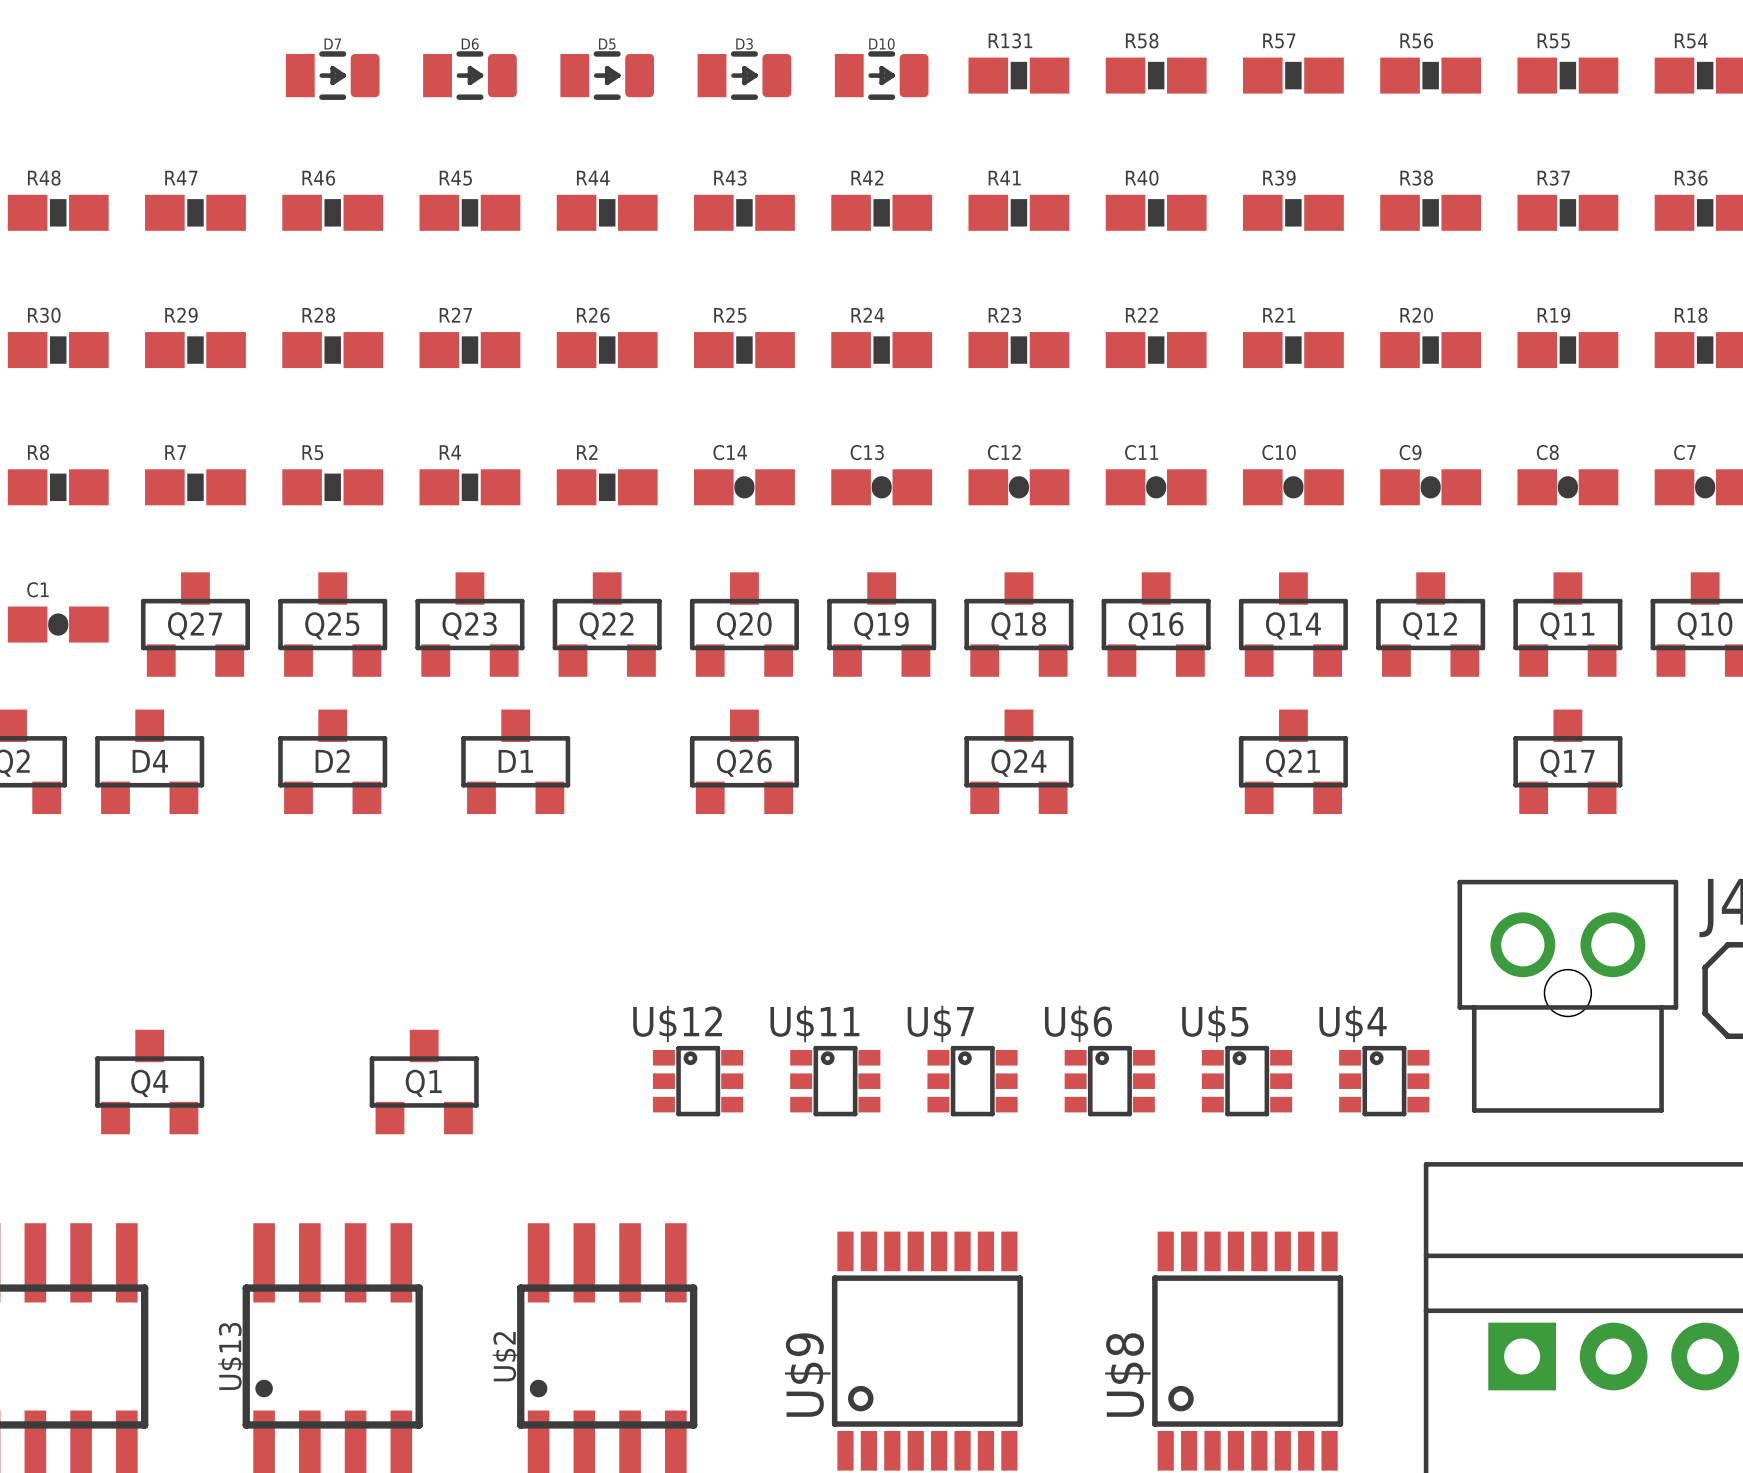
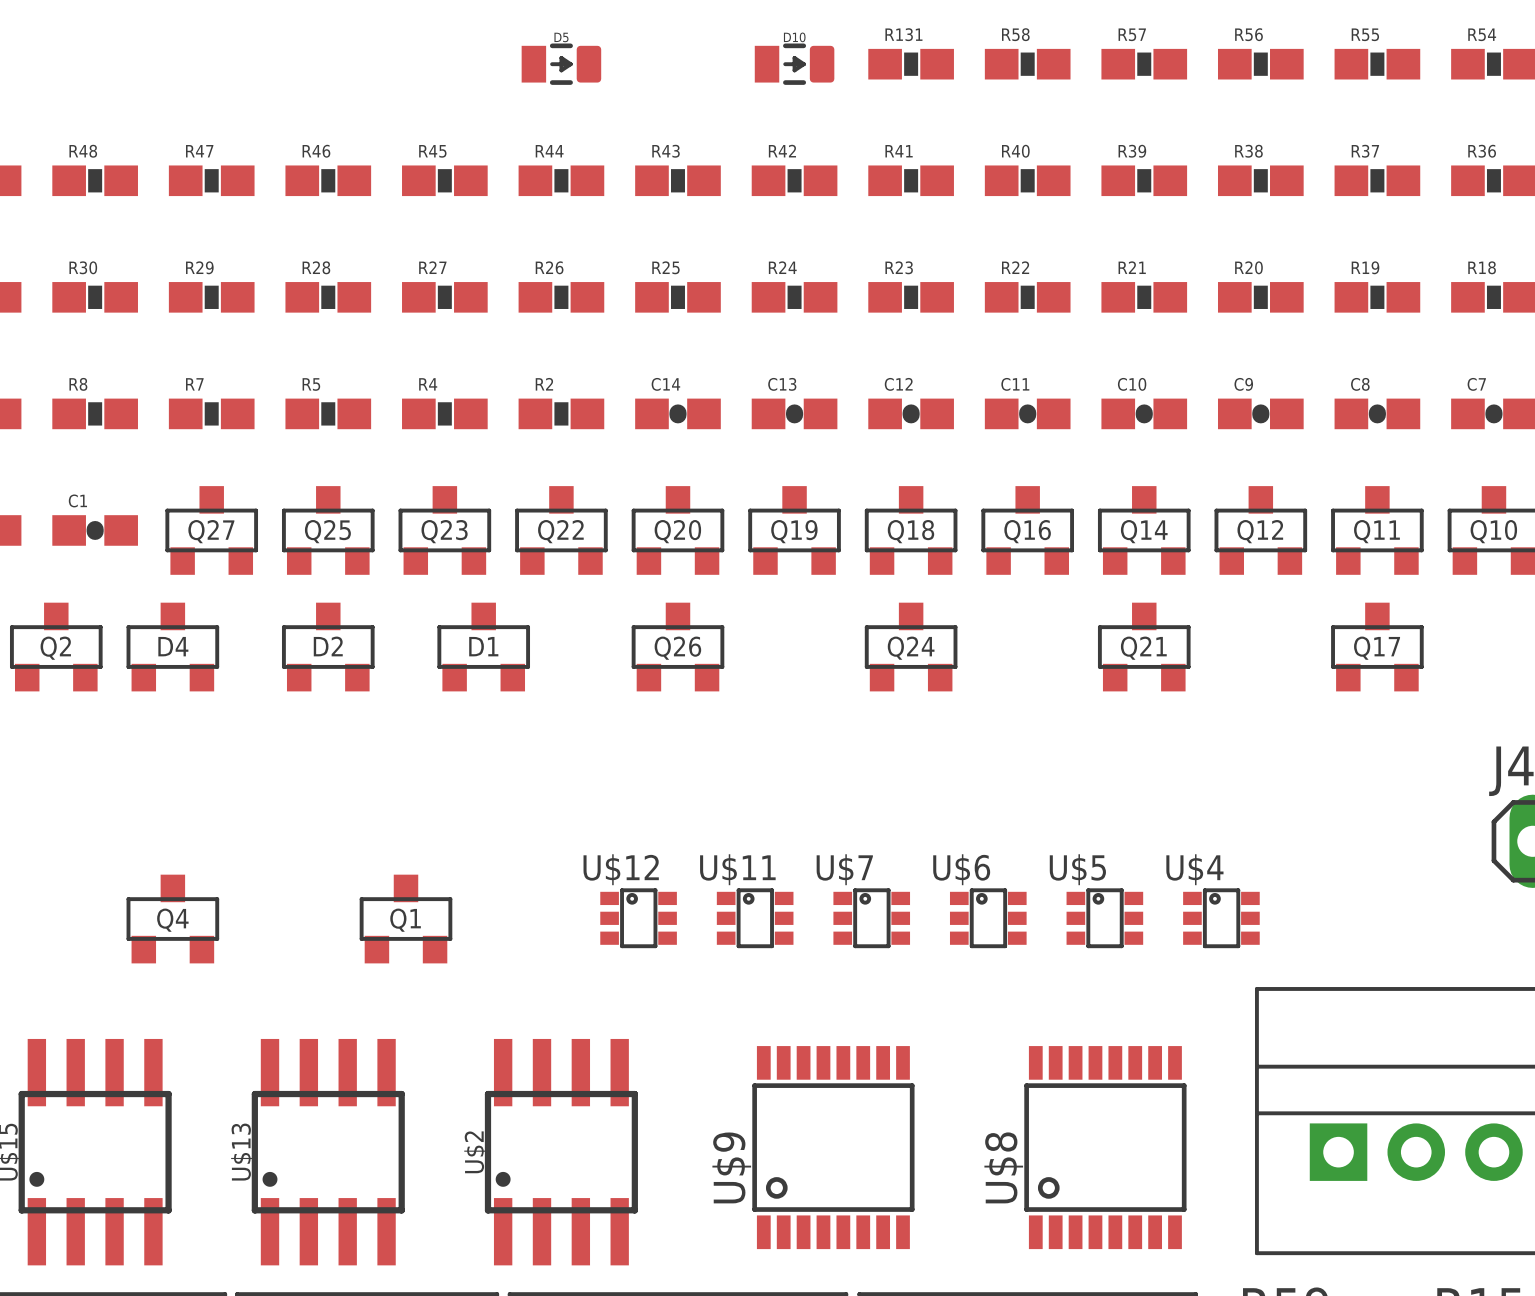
D7: (332, 75) -> none
D6: (469, 75) -> none
D3: (744, 75) -> none
part: (1567, 996) -> none

